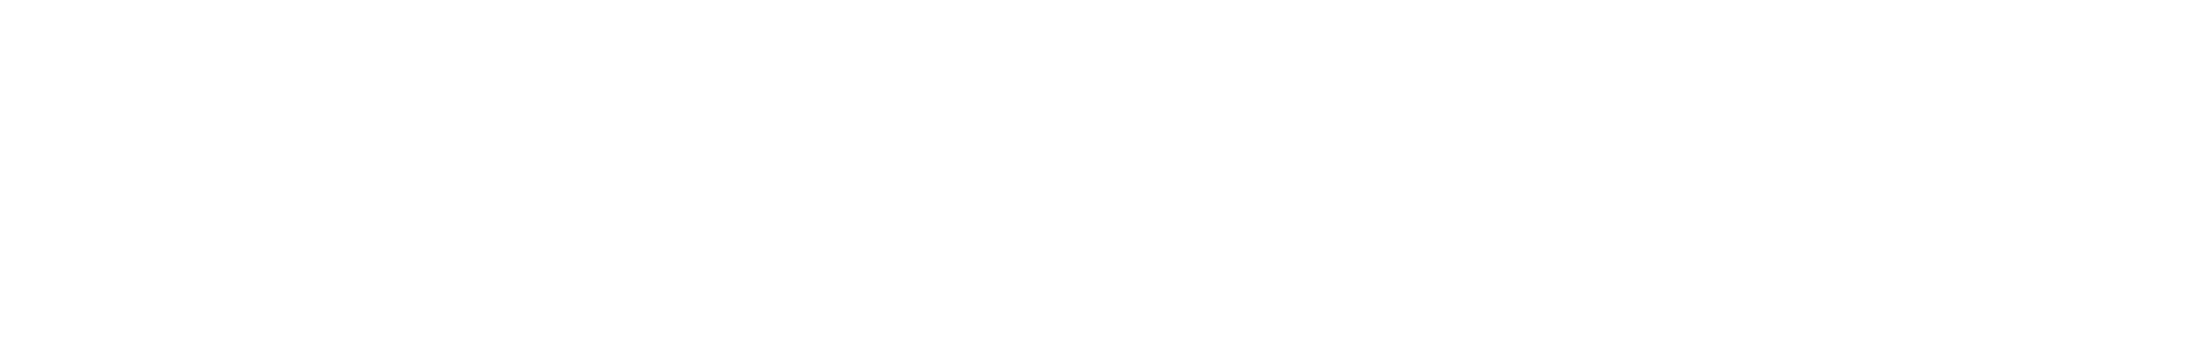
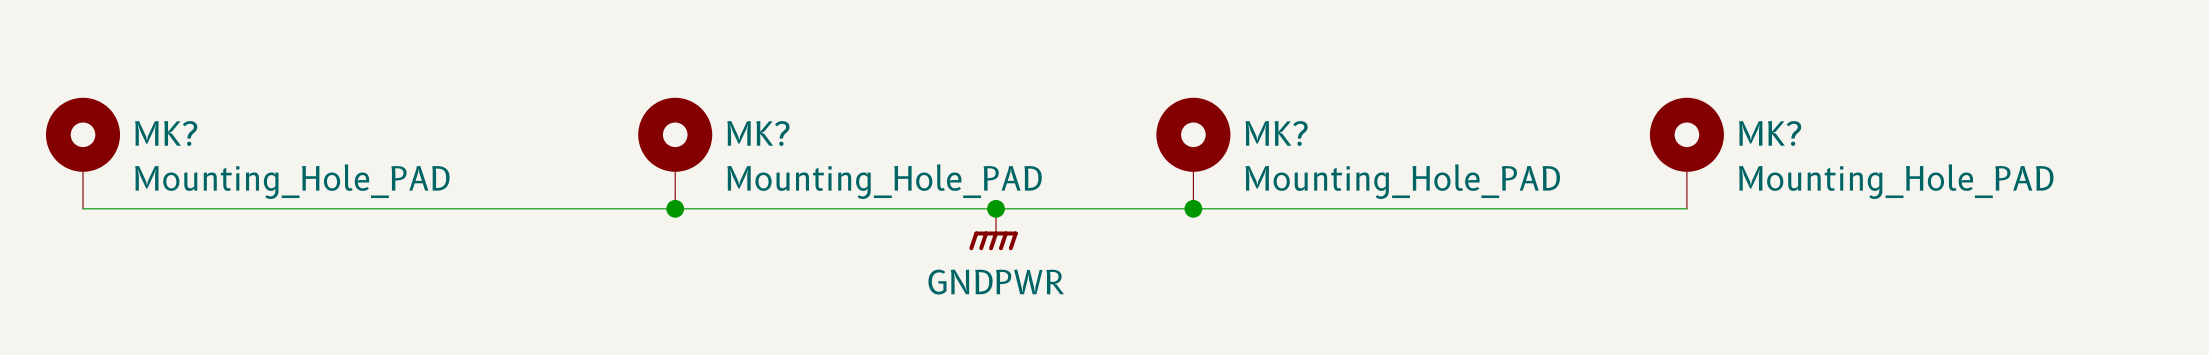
MK?: none -> Mounting_Hole_PAD (83, 153)
MK?: none -> Mounting_Hole_PAD (675, 153)
MK?: none -> Mounting_Hole_PAD (1193, 153)
MK?: none -> Mounting_Hole_PAD (1686, 153)
wire: none -> (83, 208) (1686, 208)
junction: none -> (675, 208)
junction: none -> (995, 208)
junction: none -> (1193, 208)
power symbol: none -> GNDPWR (993, 229)

